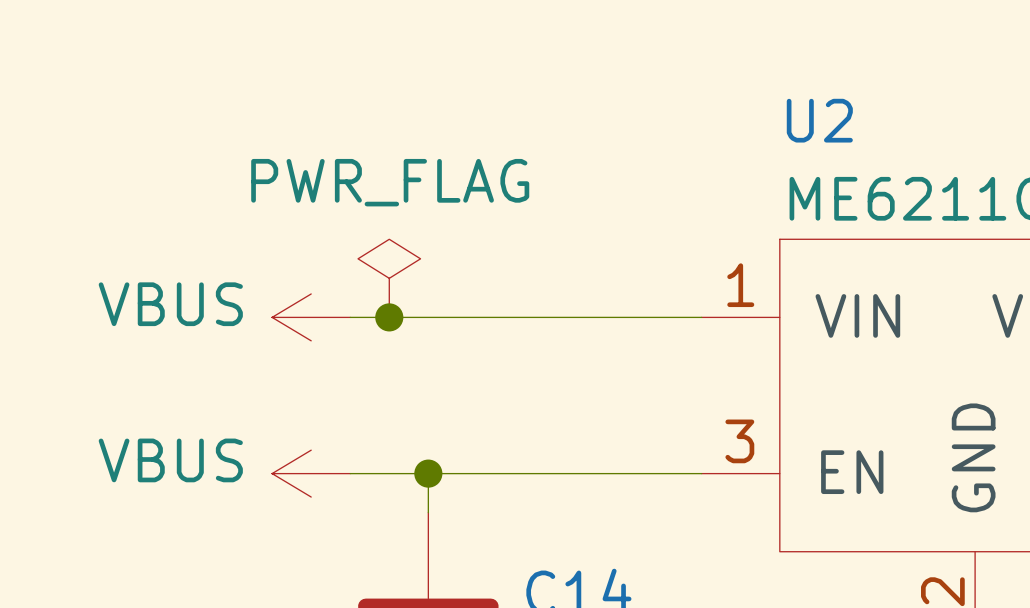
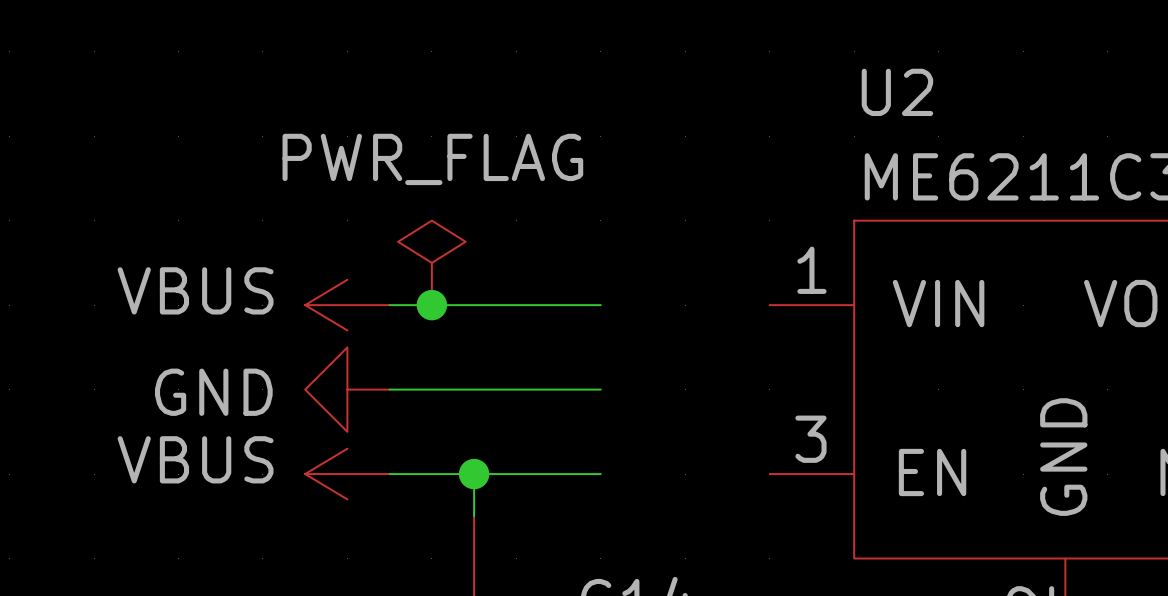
wire: (545, 317) (701, 317) -> none
power symbol: none -> GND (347, 389)
wire: none -> (389, 389) (600, 389)
wire: (545, 473) (701, 473) -> none

